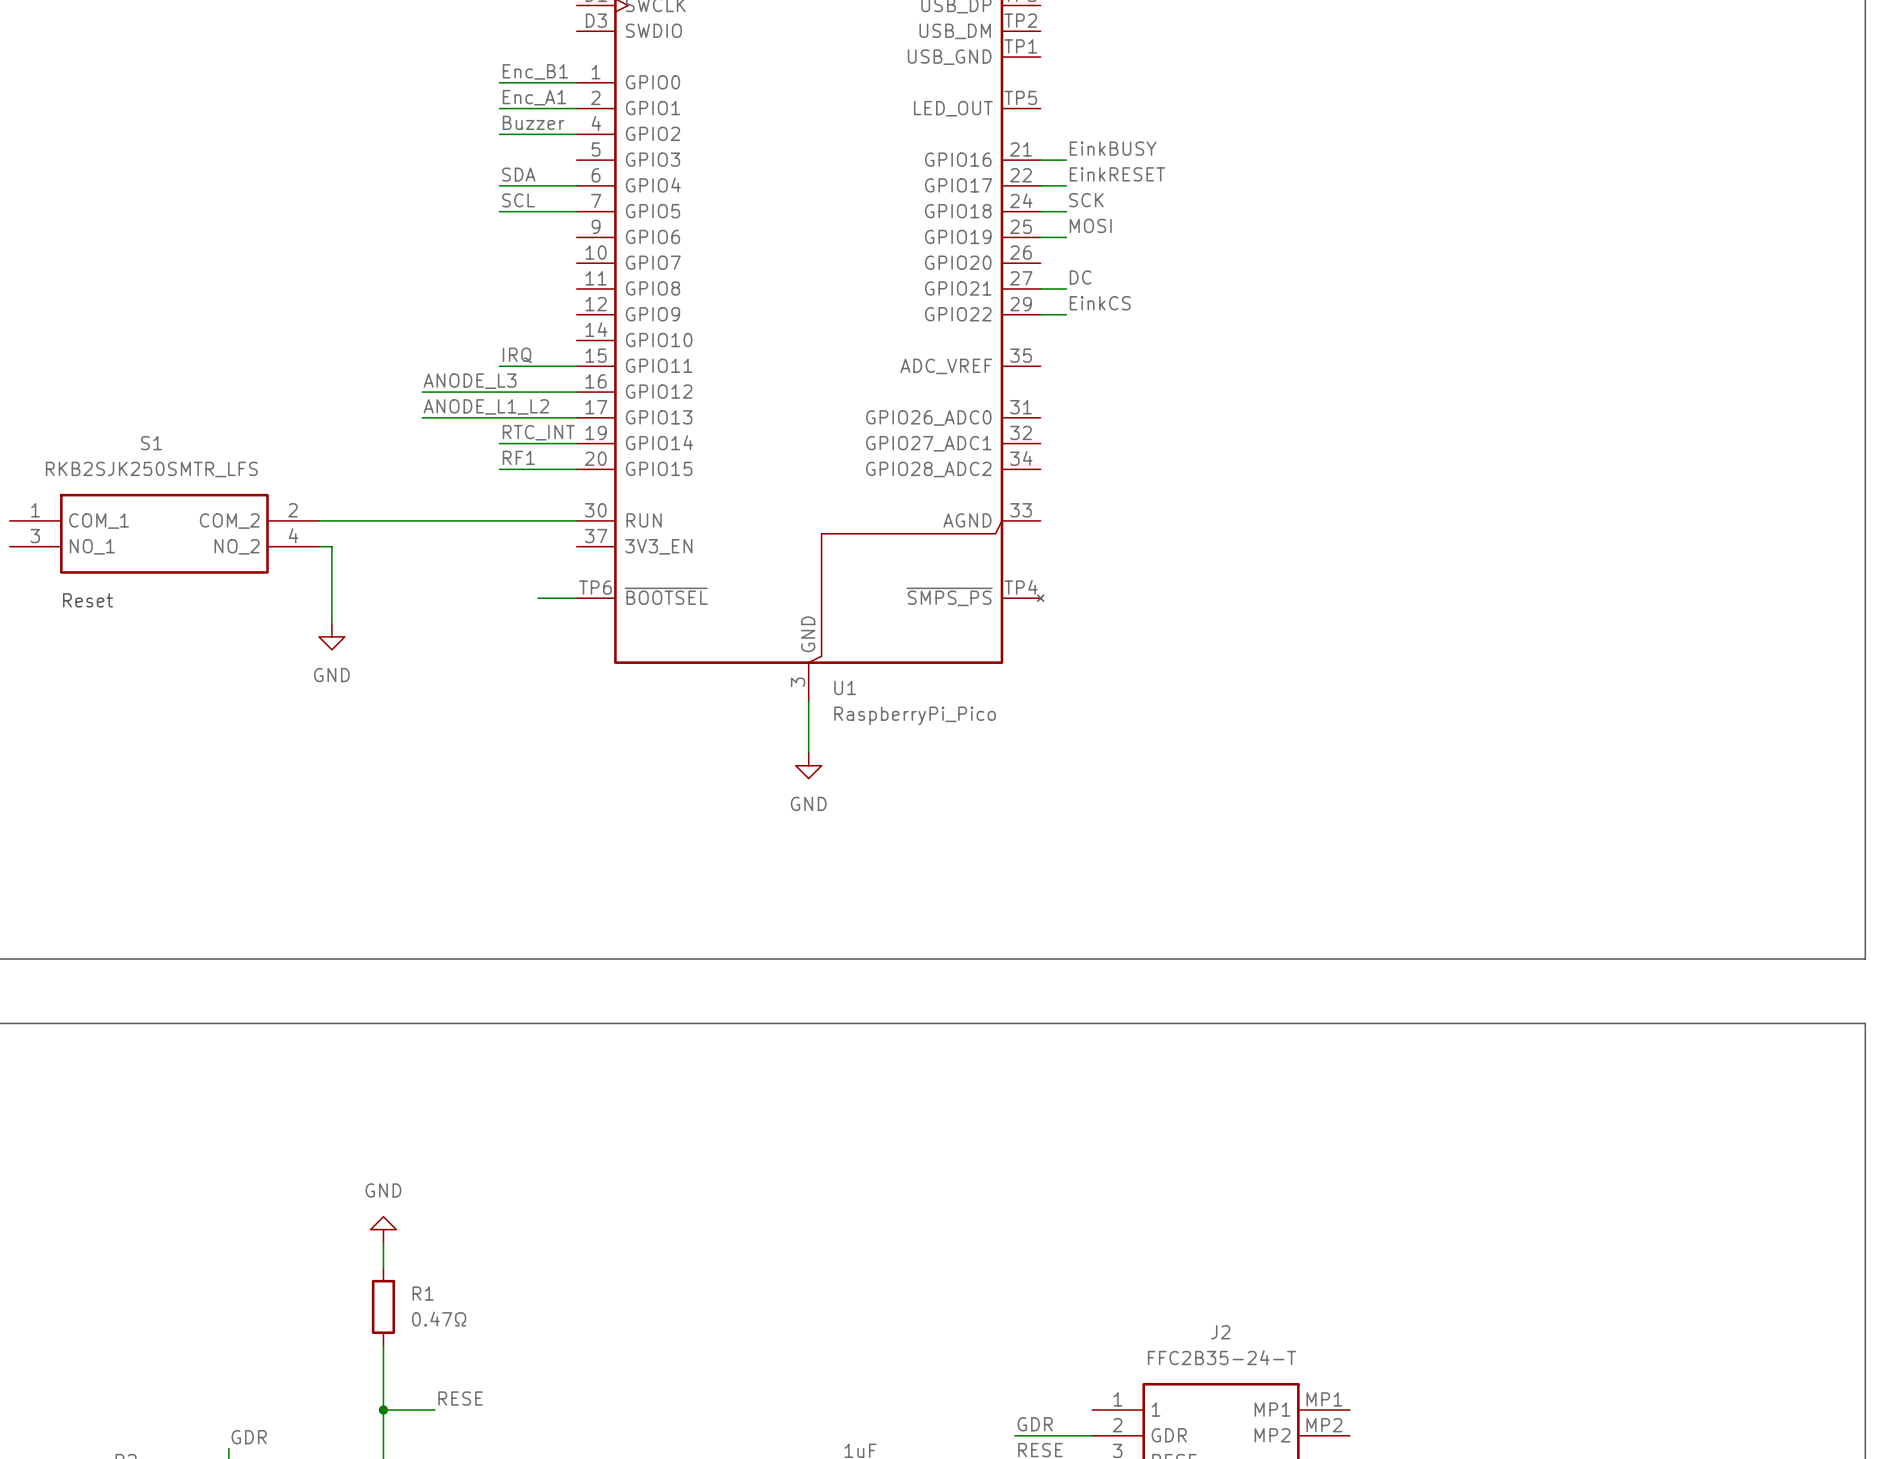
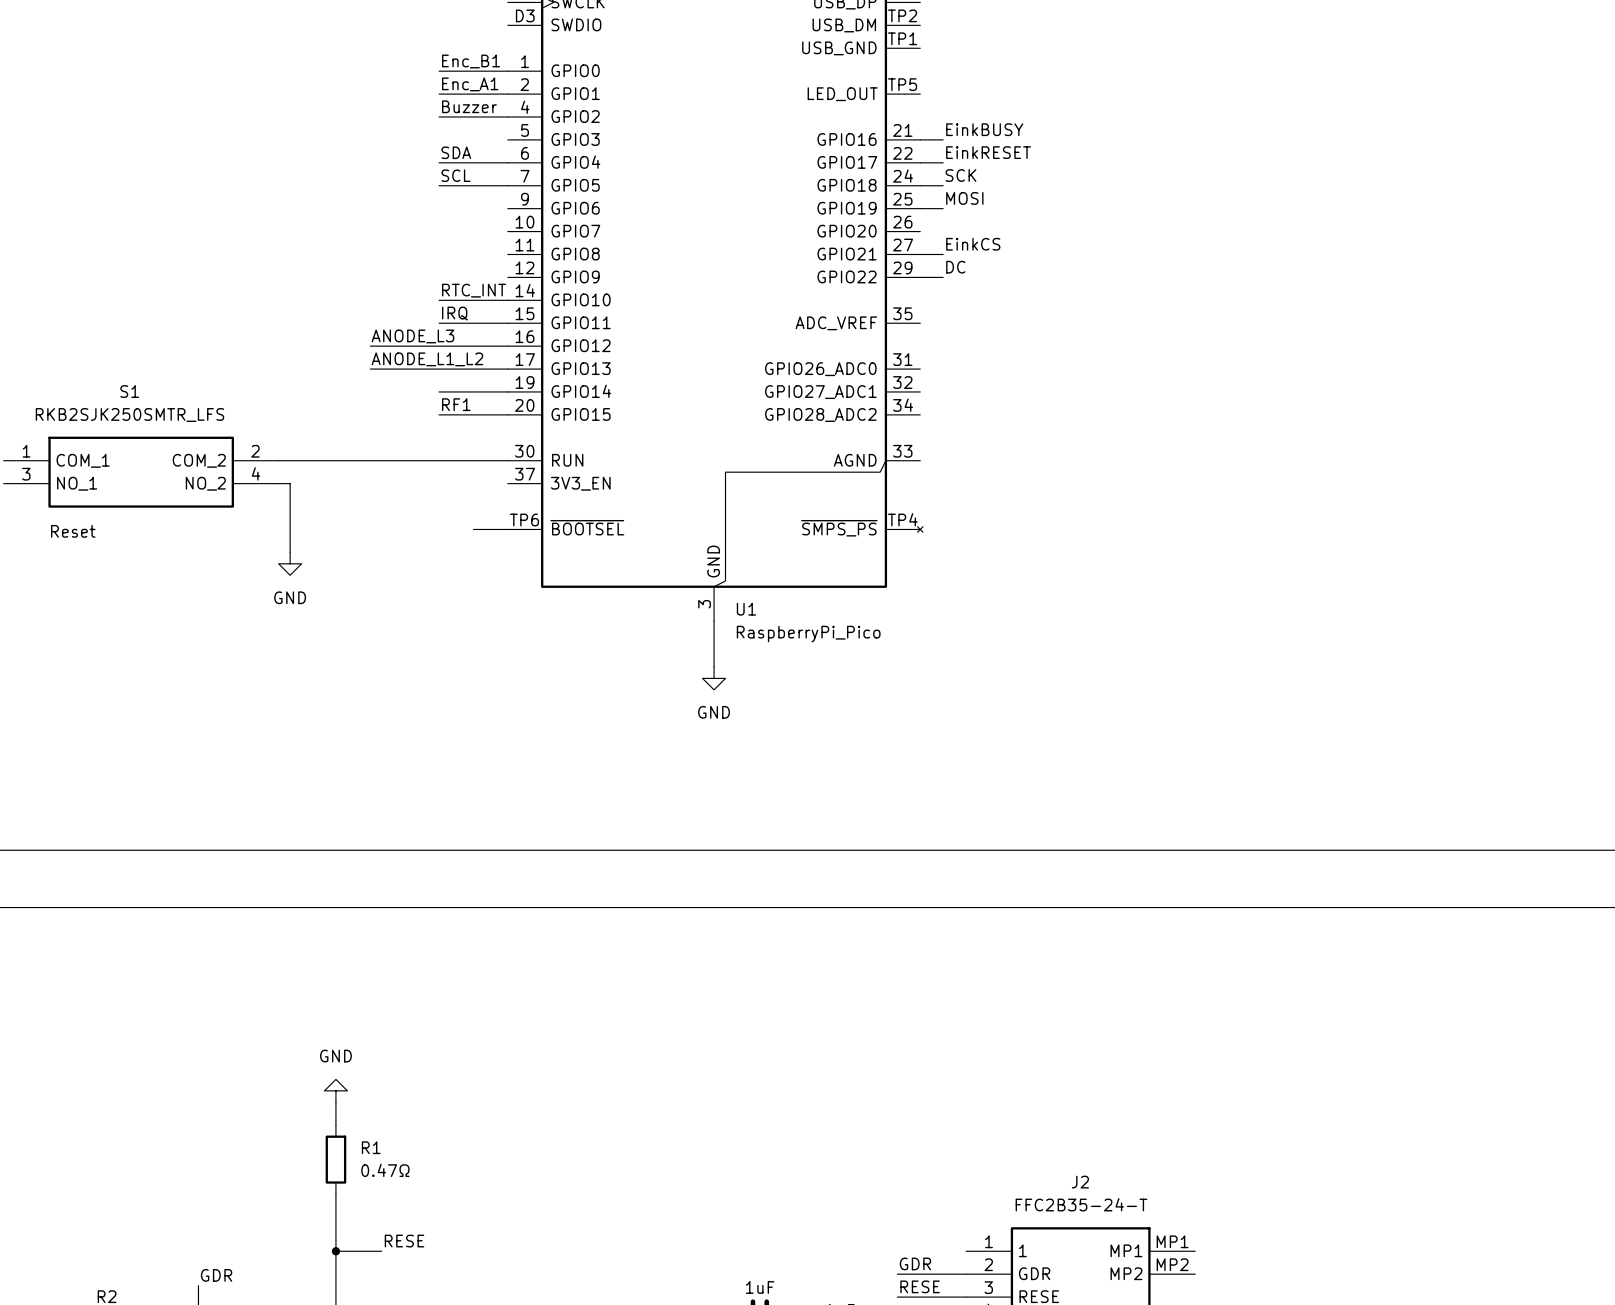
label: DC (1080, 277) -> EinkCS (973, 244)
label: EinkCS (1100, 303) -> DC (955, 267)
wire: none -> (439, 300) (507, 300)
label position: RTC_INT (538, 432) -> RTC_INT (474, 290)

